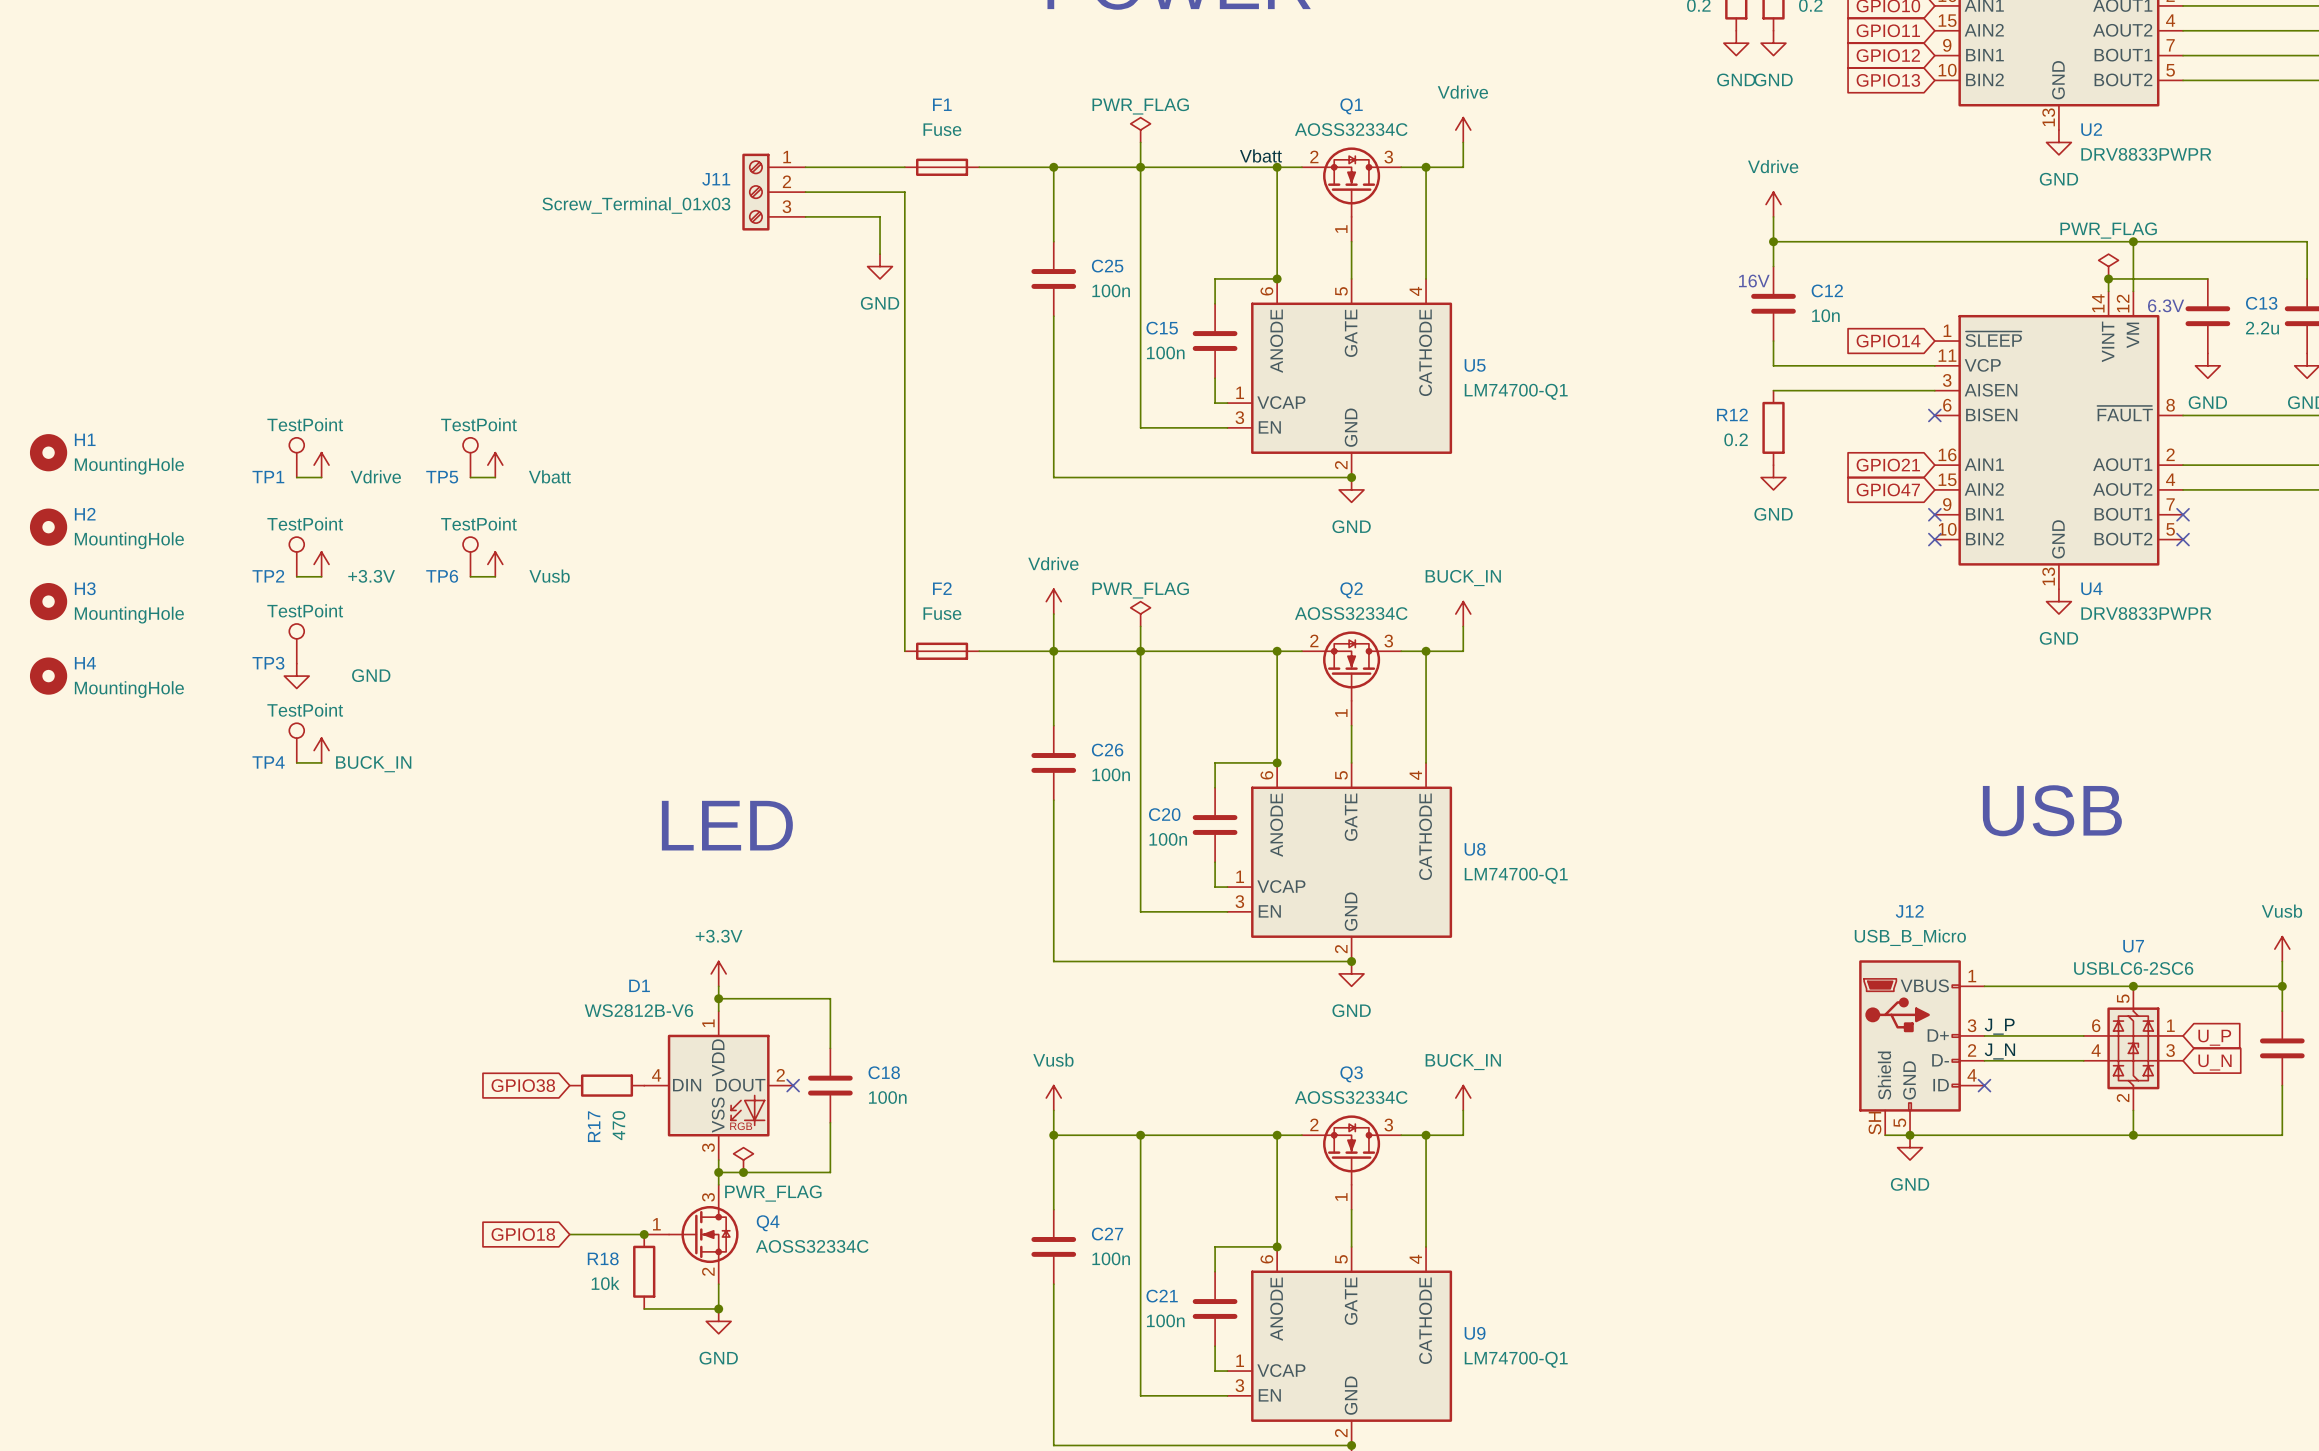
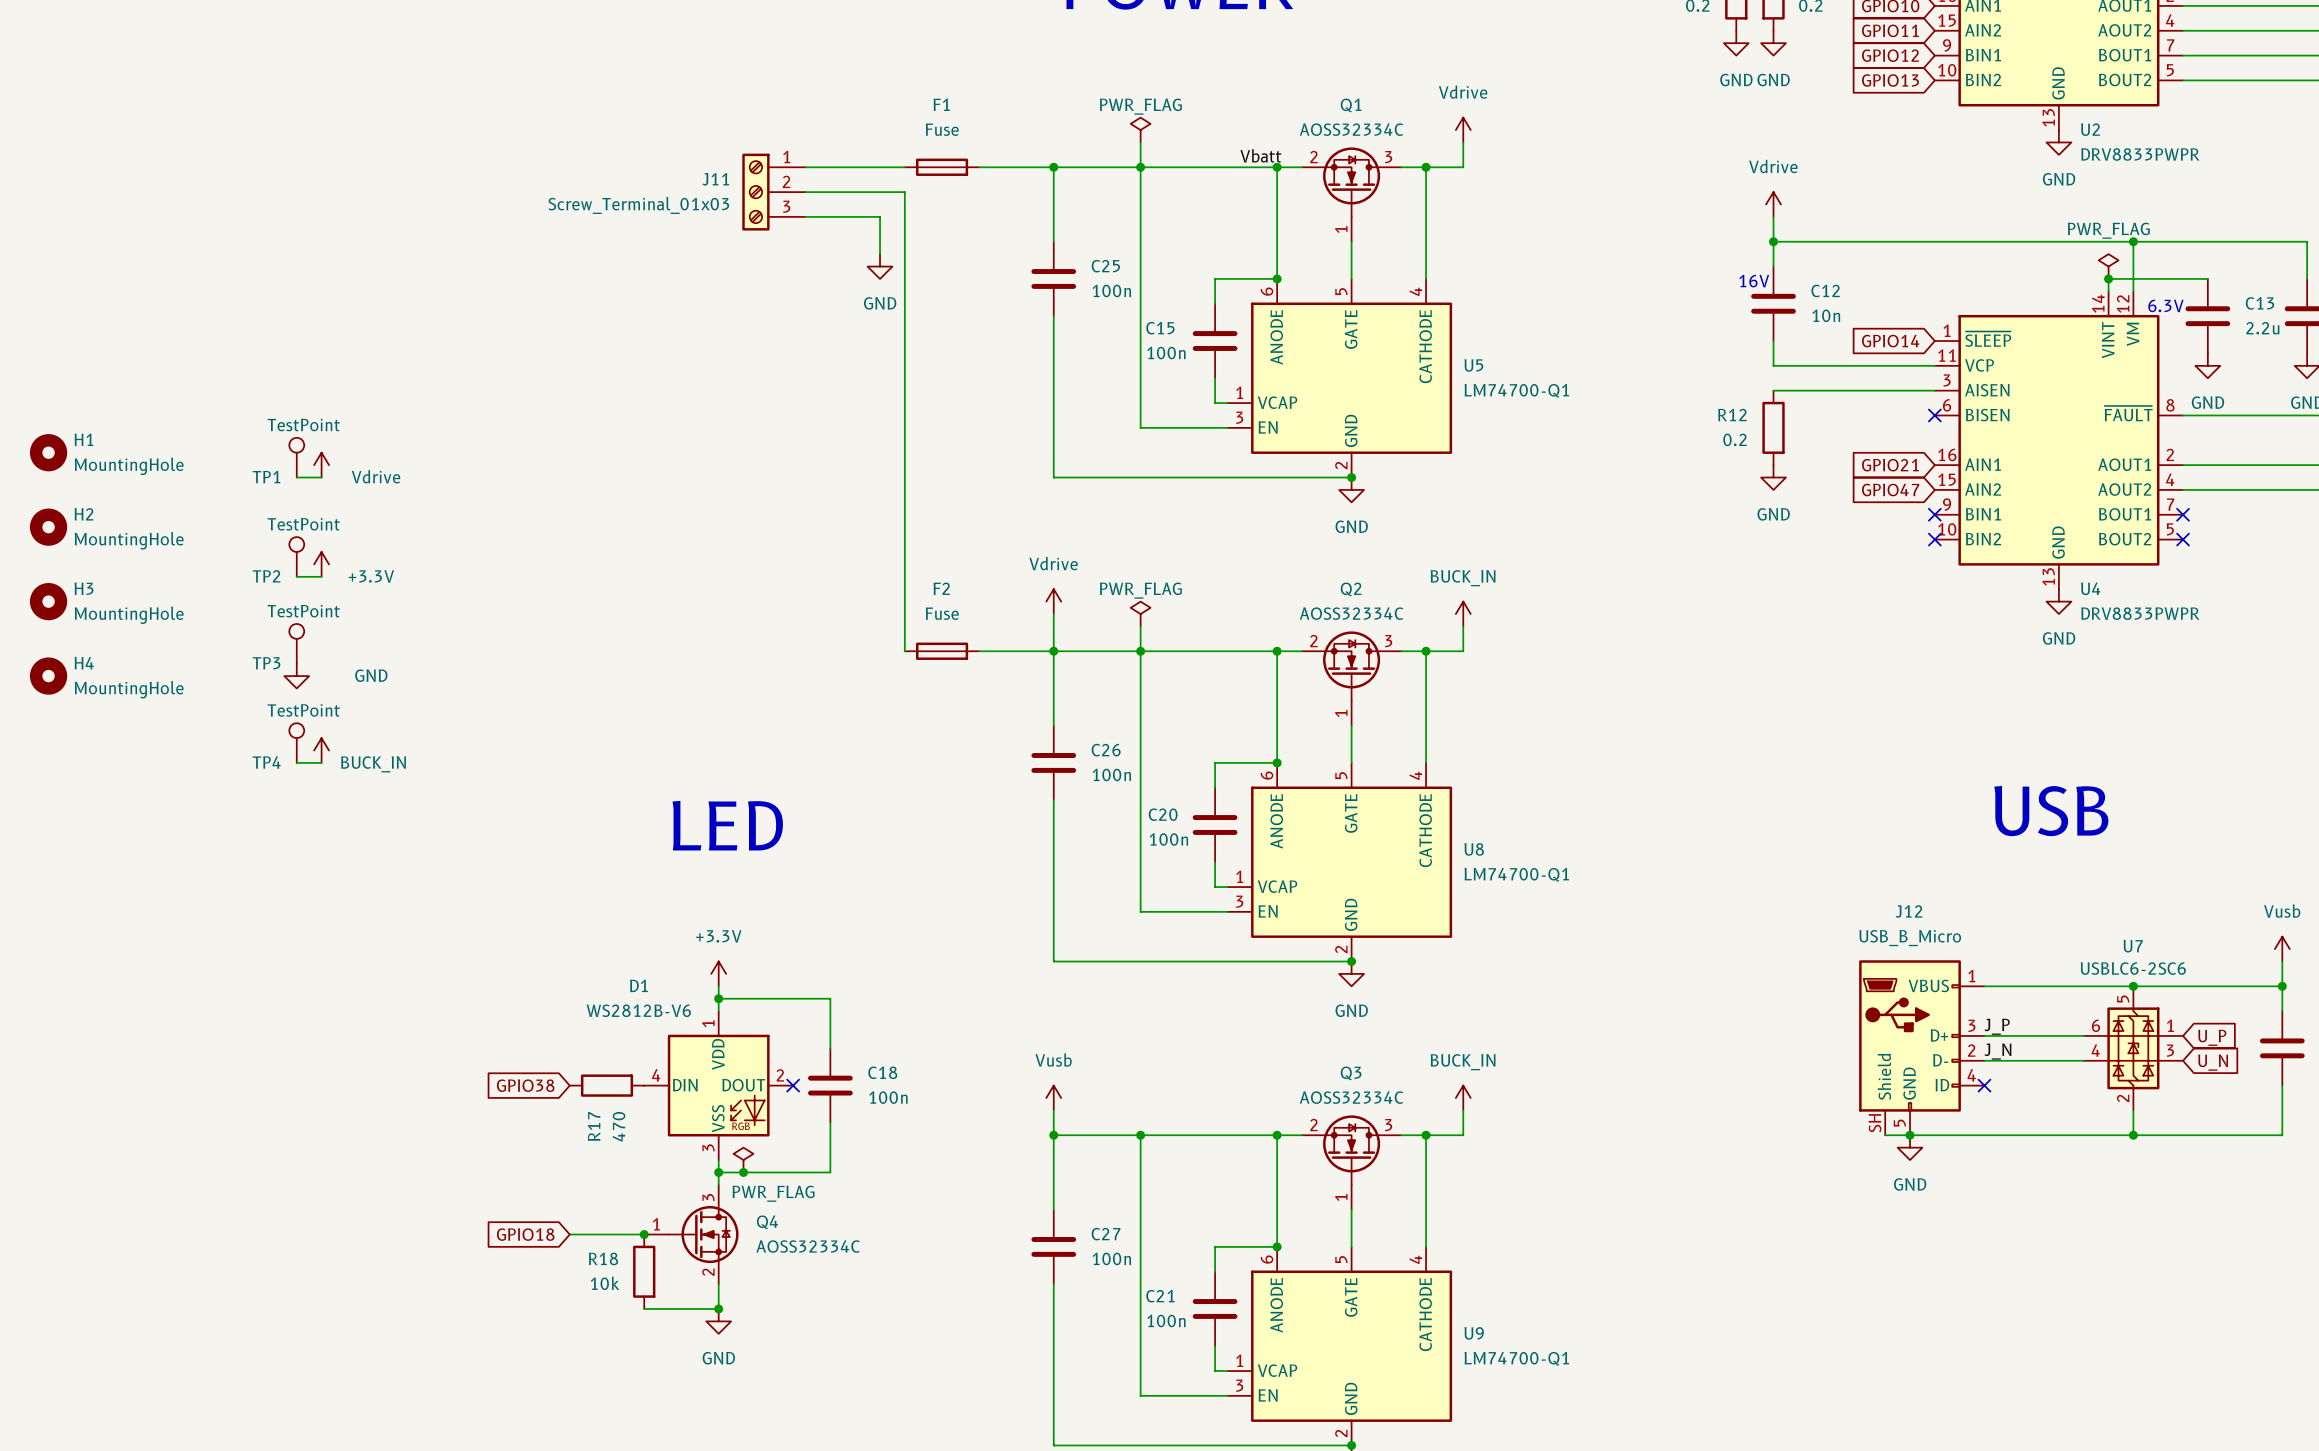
TP5: TestPoint (470, 457) -> none
power symbol: Vbatt (495, 465) -> none
wire: (470, 477) (495, 477) -> none
TP6: TestPoint (470, 556) -> none
power symbol: Vusb (495, 564) -> none
wire: (470, 576) (495, 576) -> none

